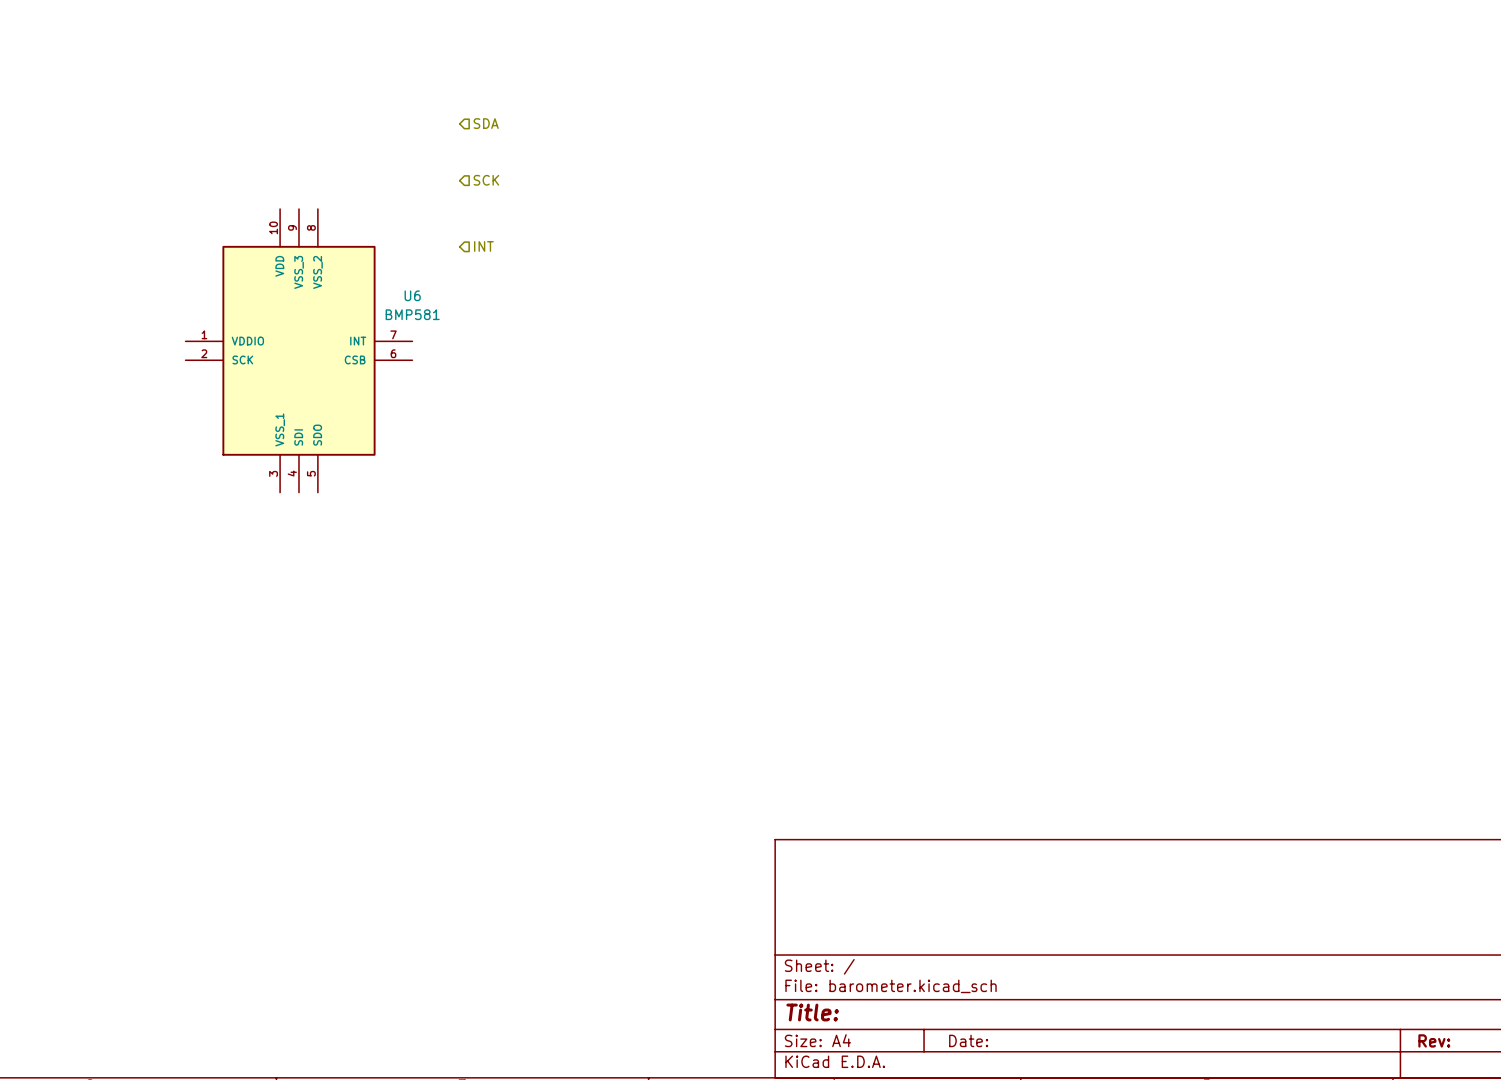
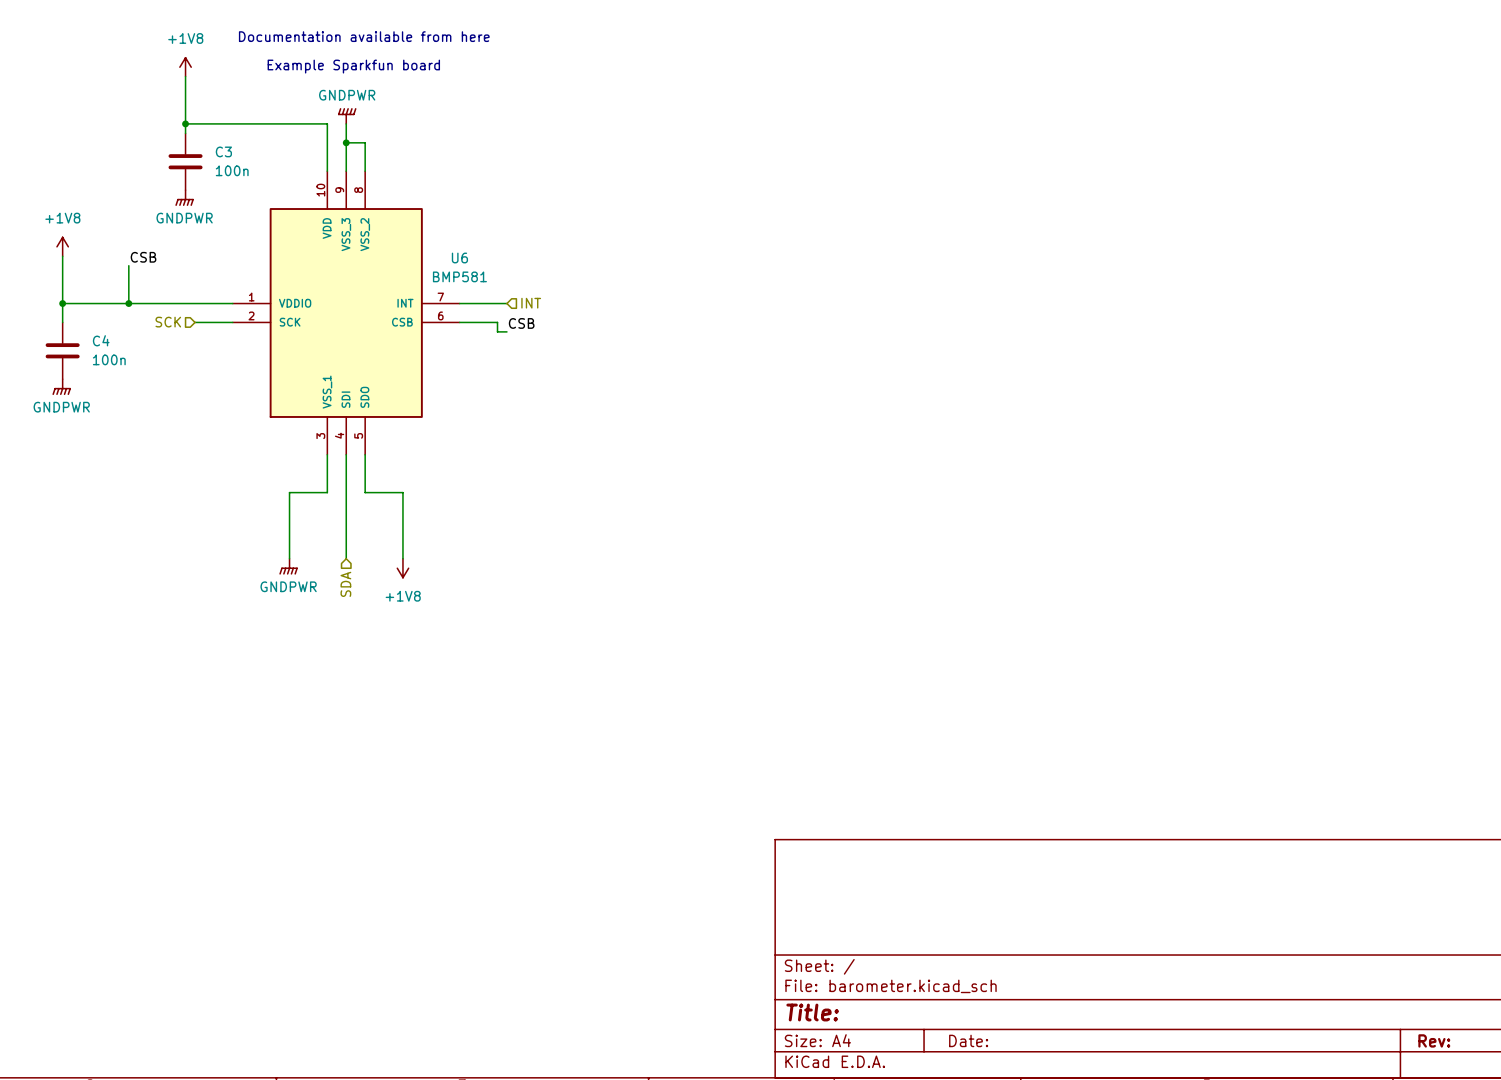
text: none -> Documentation available from here (364, 36)
text: none -> Example Sparkfun board (353, 66)
power symbol: none -> +1V8 (185, 67)
wire: none -> (185, 76) (185, 133)
power symbol: none -> GNDPWR (347, 115)
wire: none -> (185, 123) (327, 123) (327, 171)
junction: none -> (185, 123)
wire: none -> (346, 123) (346, 171)
hierarchical label: SDA (486, 123) -> none
wire: none -> (346, 142) (365, 142) (365, 171)
junction: none -> (346, 142)
C3: none -> 100n (185, 161)
hierarchical label: SCK (486, 180) -> none
power symbol: none -> GNDPWR (184, 198)
power symbol: none -> +1V8 (62, 246)
hierarchical label position: INT (483, 246) -> INT (531, 303)
wire: none -> (62, 256) (62, 322)
label: none -> CSB (143, 257)
wire: none -> (128, 265) (128, 303)
wire: none -> (62, 303) (232, 303)
junction: none -> (62, 303)
junction: none -> (128, 303)
wire: none -> (459, 303) (506, 303)
hierarchical label: none -> SCK (168, 322)
wire: none -> (195, 322) (232, 322)
wire: none -> (459, 322) (497, 322) (497, 331) (506, 331)
label: none -> CSB (521, 323)
C4: none -> 100n (62, 350)
U6 position: (298, 350) -> (346, 312)
power symbol: none -> GNDPWR (61, 387)
wire: none -> (327, 454) (327, 492) (289, 492) (289, 558)
wire: none -> (346, 454) (346, 558)
wire: none -> (365, 454) (365, 492) (402, 492) (402, 558)
power symbol: none -> GNDPWR (288, 566)
power symbol: none -> +1V8 (402, 568)
hierarchical label: none -> SDA (345, 584)

